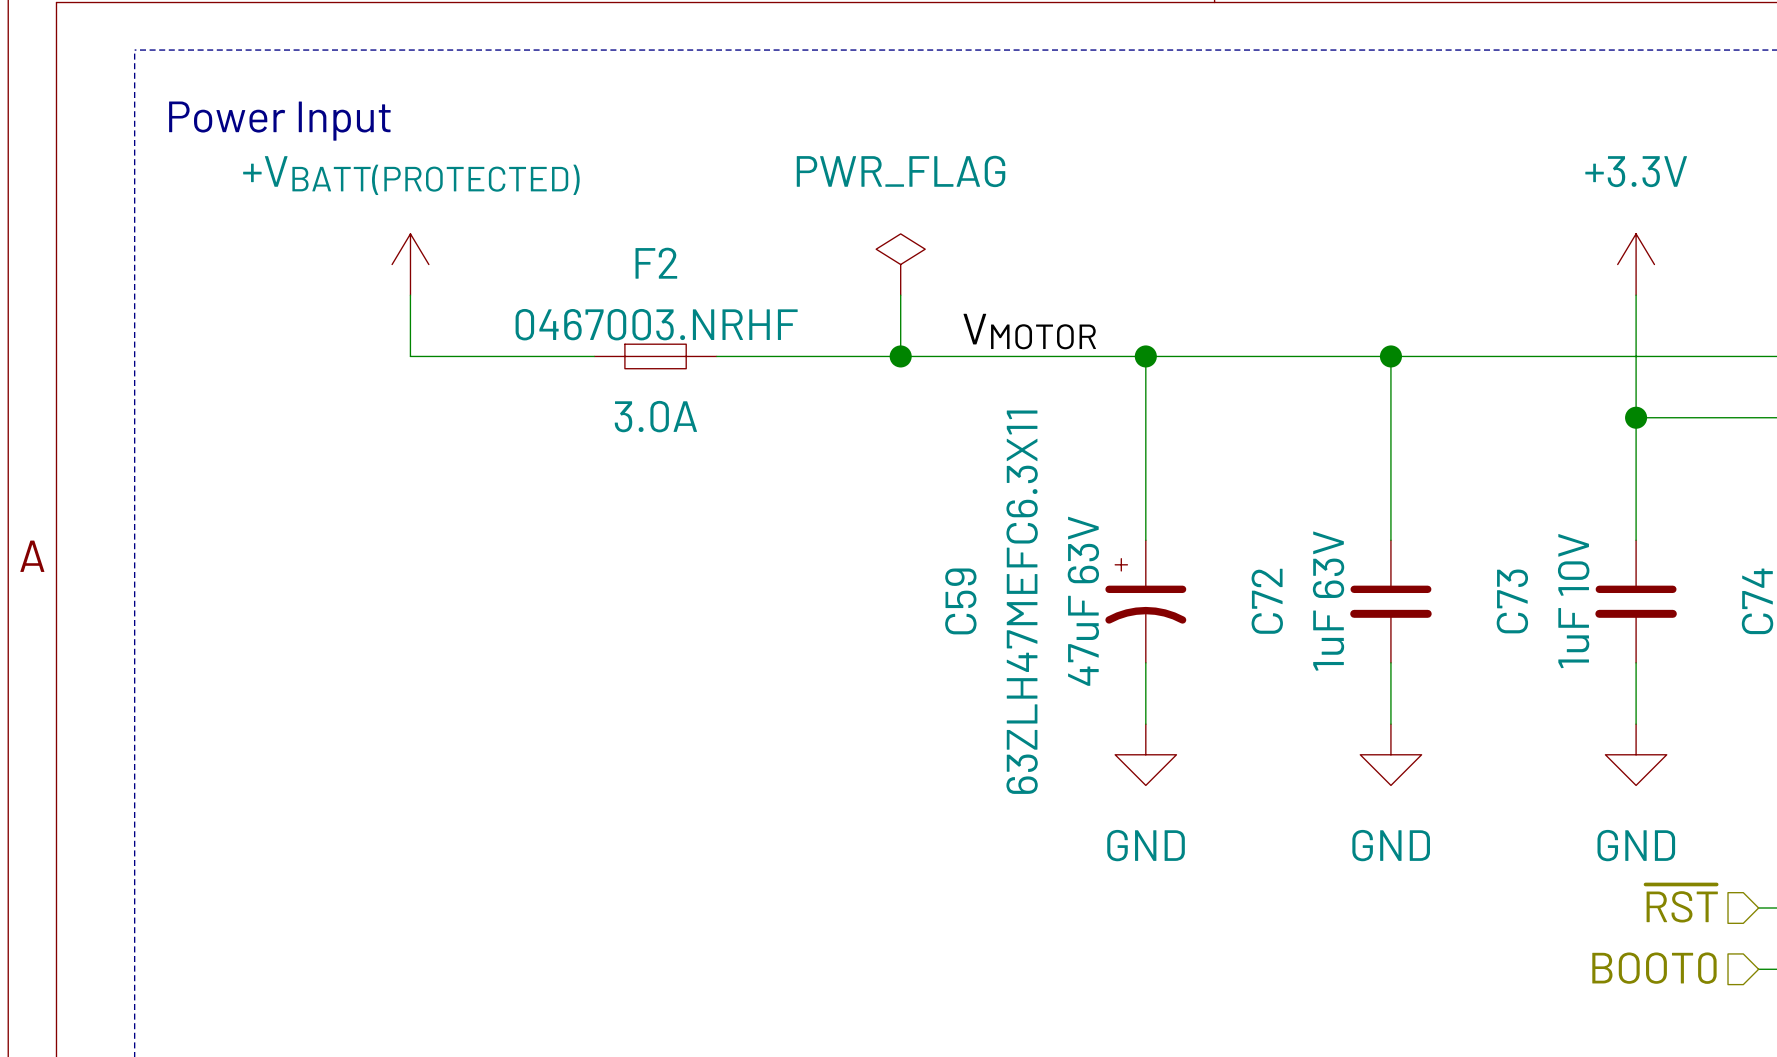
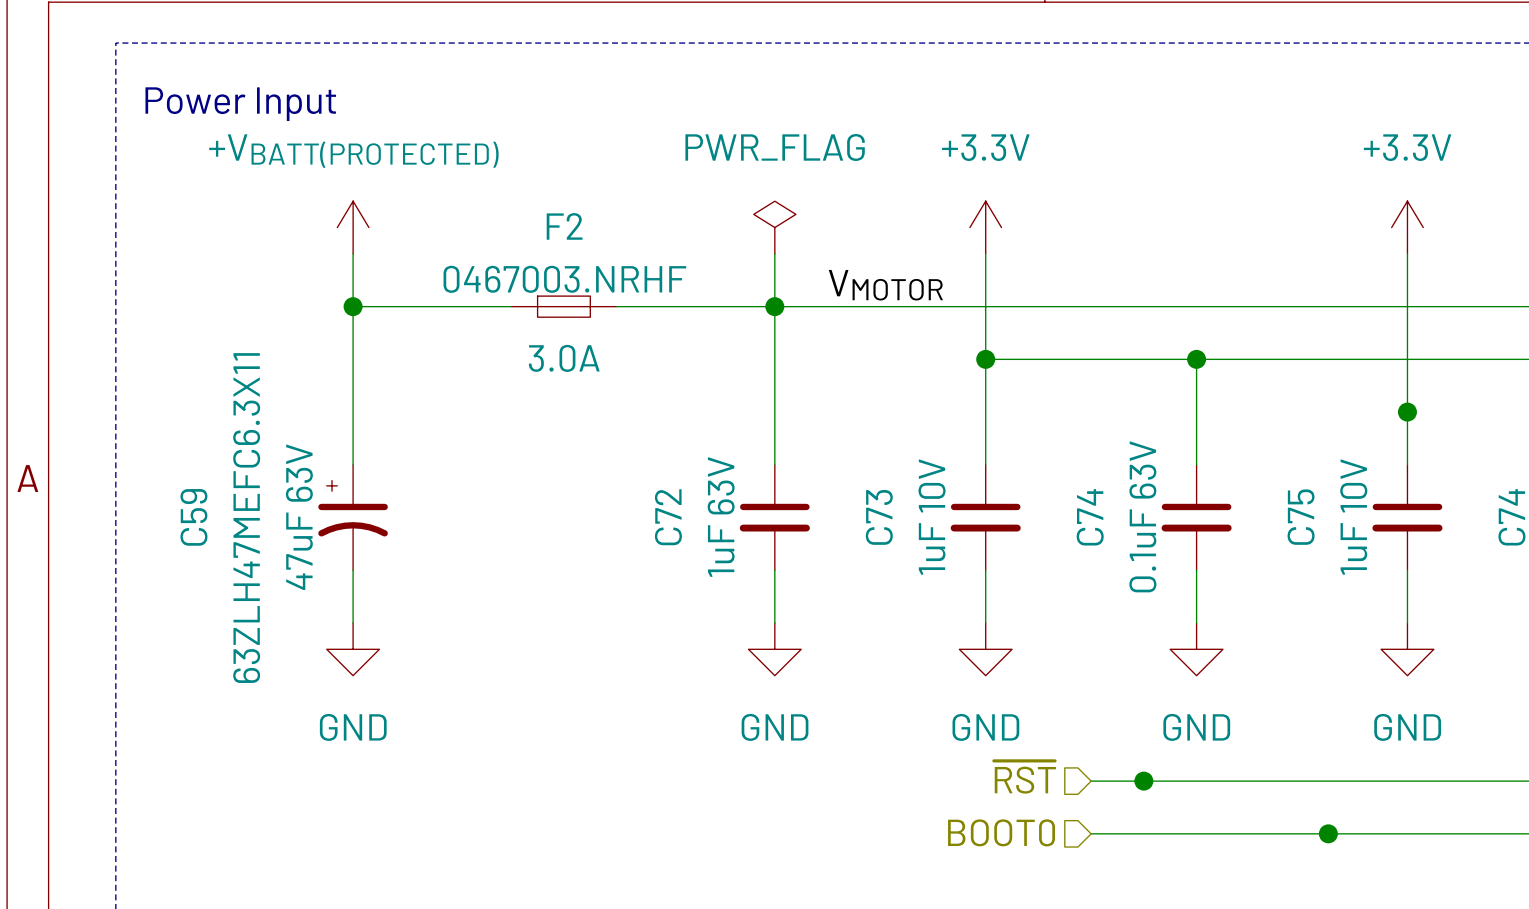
power symbol: none -> +3.3V (985, 227)
wire: none -> (353, 306) (353, 464)
junction: none -> (353, 306)
wire: none -> (774, 306) (774, 464)
junction position: (1145, 356) -> (985, 359)
wire: (1390, 356) (1390, 417) -> (985, 253) (985, 306)
junction position: (1390, 356) -> (1196, 359)
wire: none -> (985, 359) (1407, 359)
junction position: (1636, 417) -> (1407, 412)
C72: none -> 1uF 63V (774, 517)
C59 position: (1145, 601) -> (353, 517)
C73: none -> 1uF 10V (985, 517)
C72 name: C72 (1267, 601) -> C74 (1090, 517)
C72 value: 1uF 63V (1328, 601) -> 0.1uF 63V (1142, 516)
C73 name: C73 (1512, 601) -> C75 (1301, 517)
wire: none -> (353, 570) (353, 622)
wire: none -> (774, 570) (774, 622)
power symbol: none -> GND (353, 649)
power symbol: none -> GND (774, 649)
hierarchical label position: ~{RST} (1681, 903) -> ~{RST} (1024, 777)
wire: none -> (1091, 781) (1512, 781)
junction: none -> (1143, 781)
hierarchical label position: BOOT0 (1654, 968) -> BOOT0 (1001, 832)
wire: none -> (1091, 833) (1512, 833)
junction: none -> (1328, 833)

